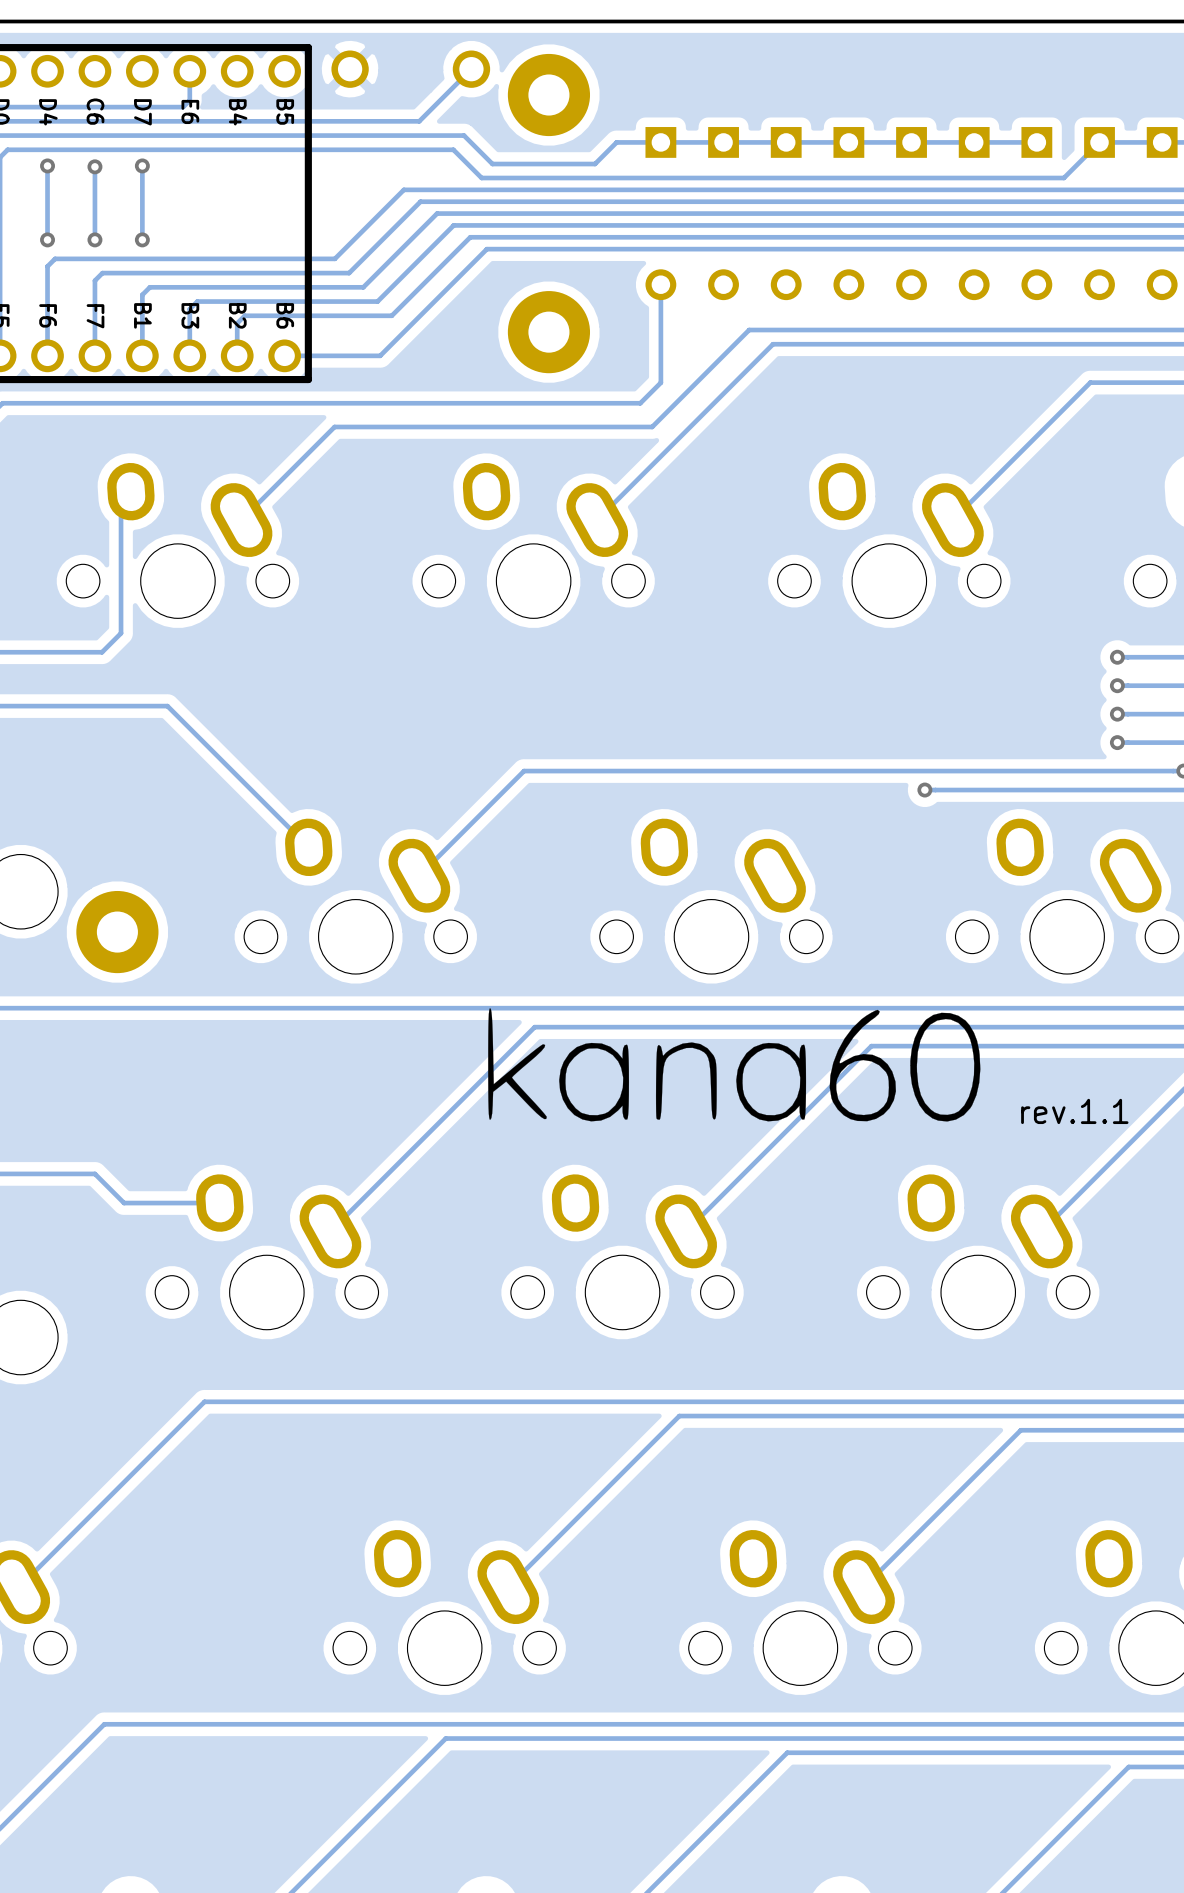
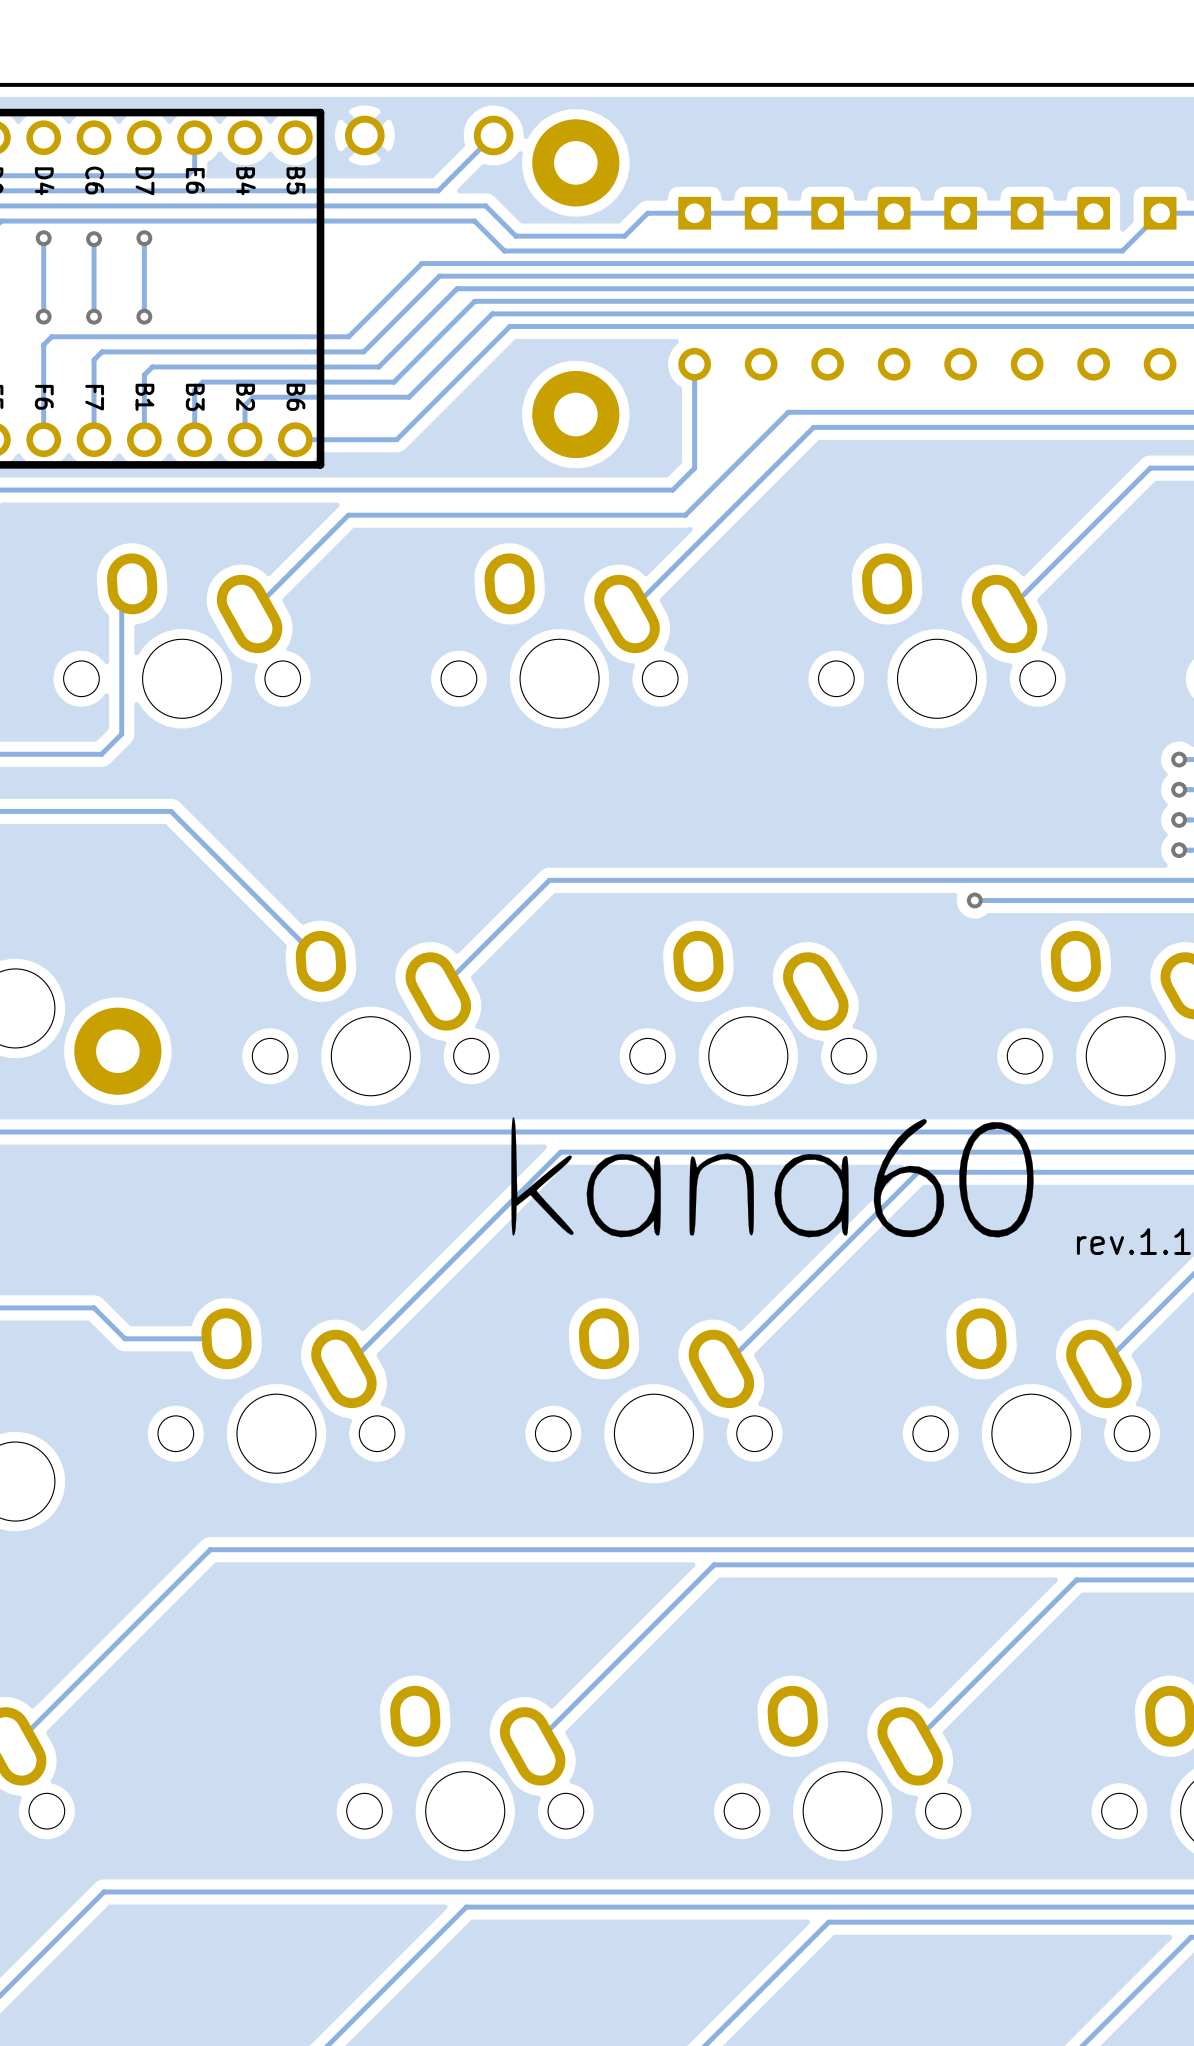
drawing position: (734, 1064) -> (772, 1177)

